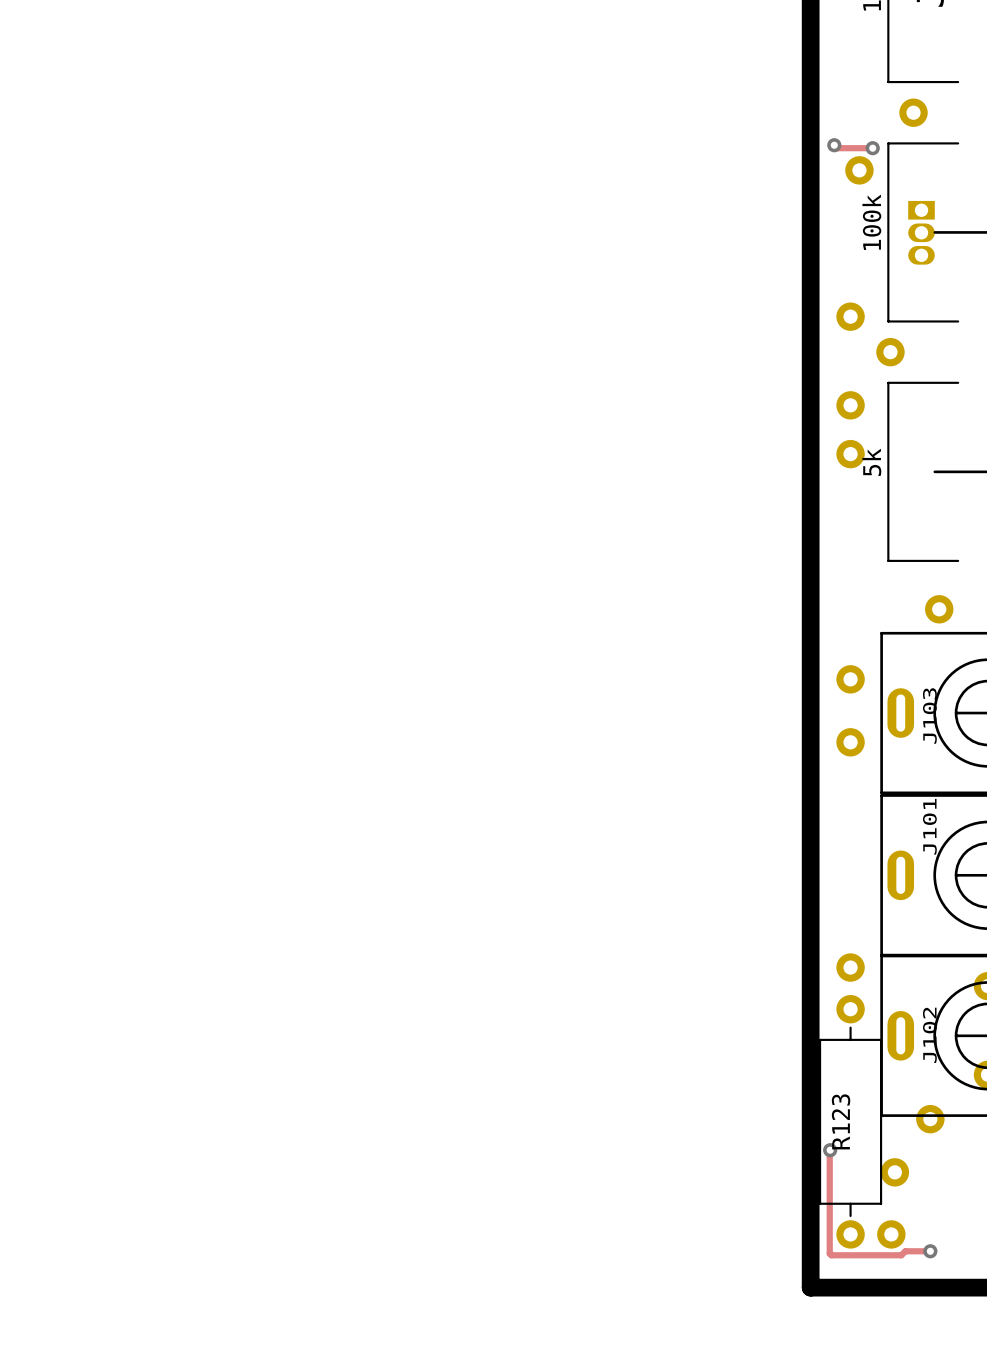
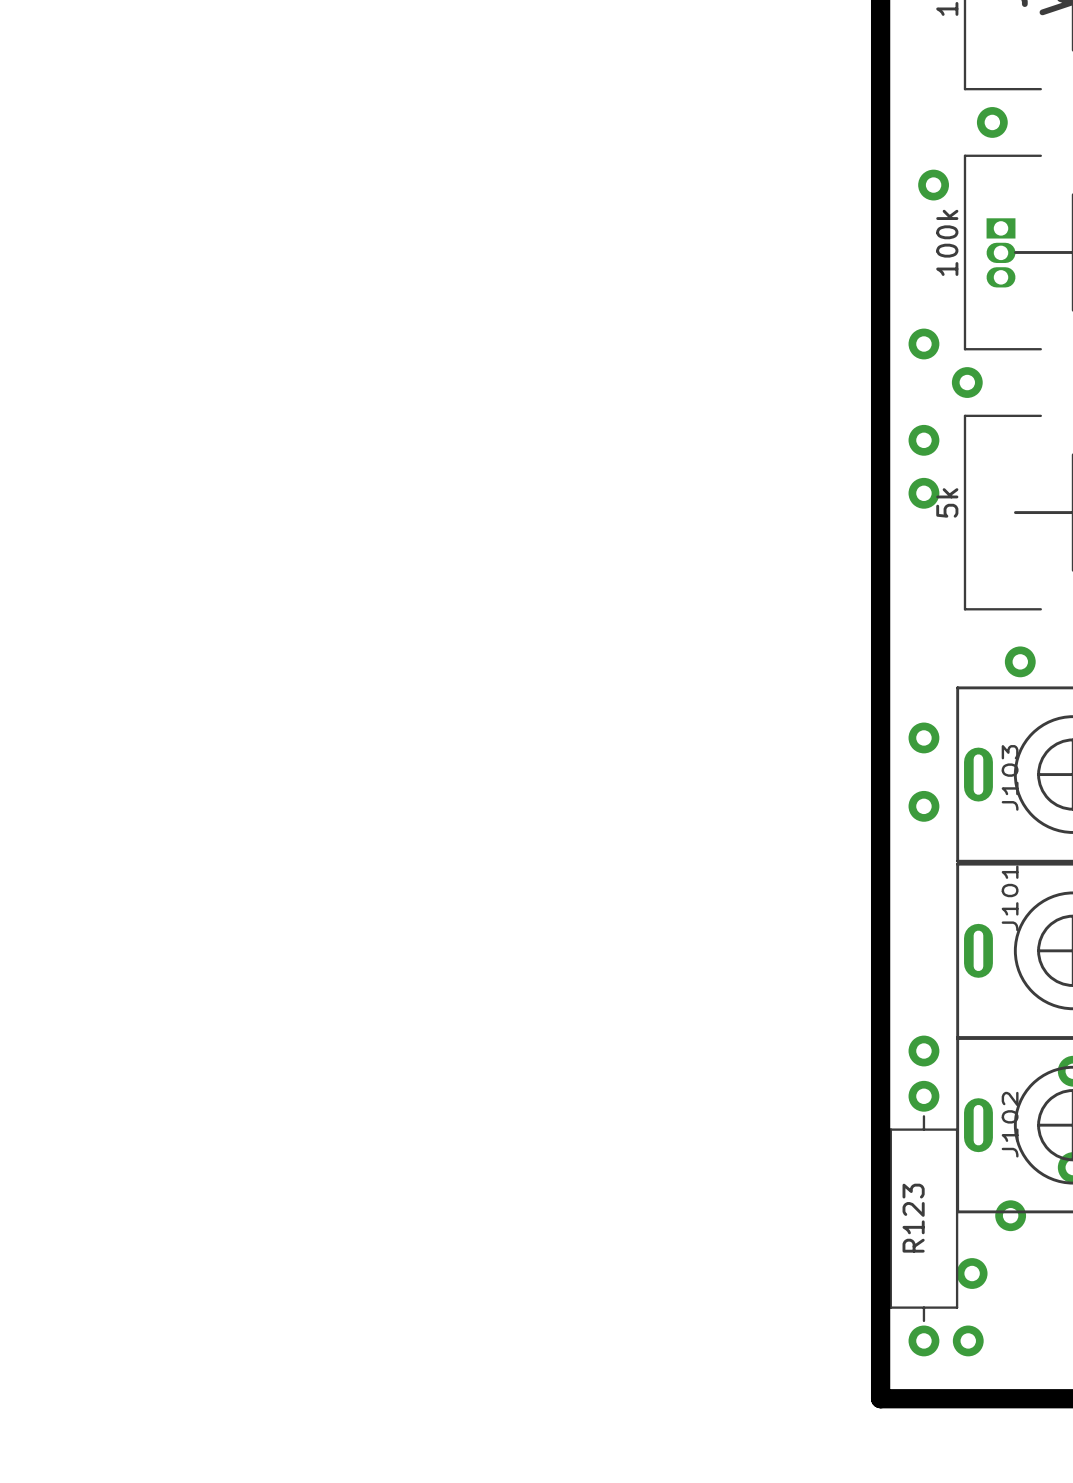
track: (834, 145) (837, 148) (872, 148) -> none
via: (834, 145) -> none
via: (872, 148) -> none
track: (830, 1150) (829, 1253) (831, 1255) (901, 1255) (905, 1251) (930, 1251) -> none
via: (830, 1150) -> none
via: (930, 1251) -> none

